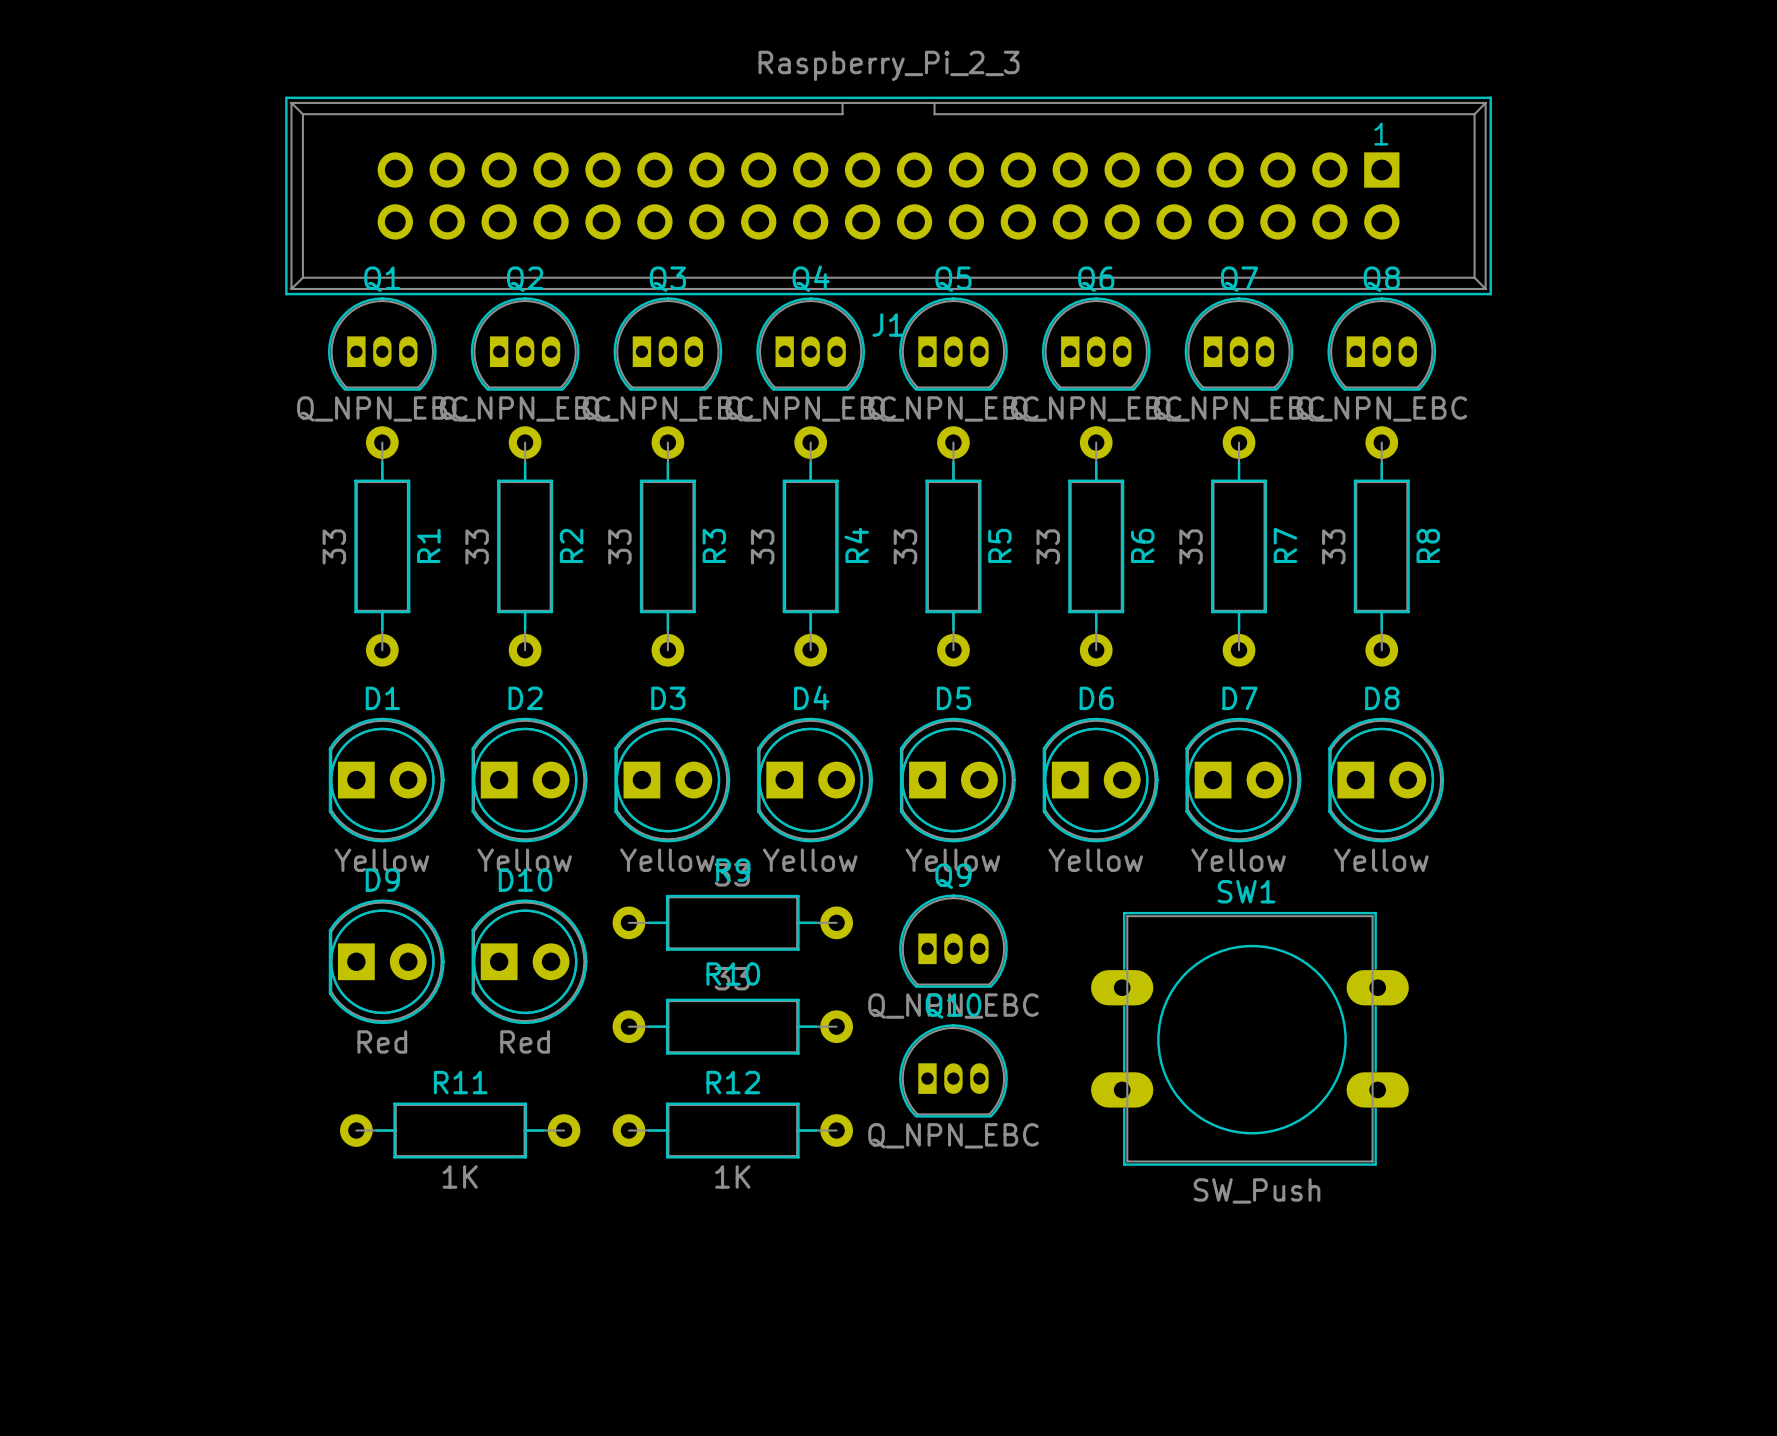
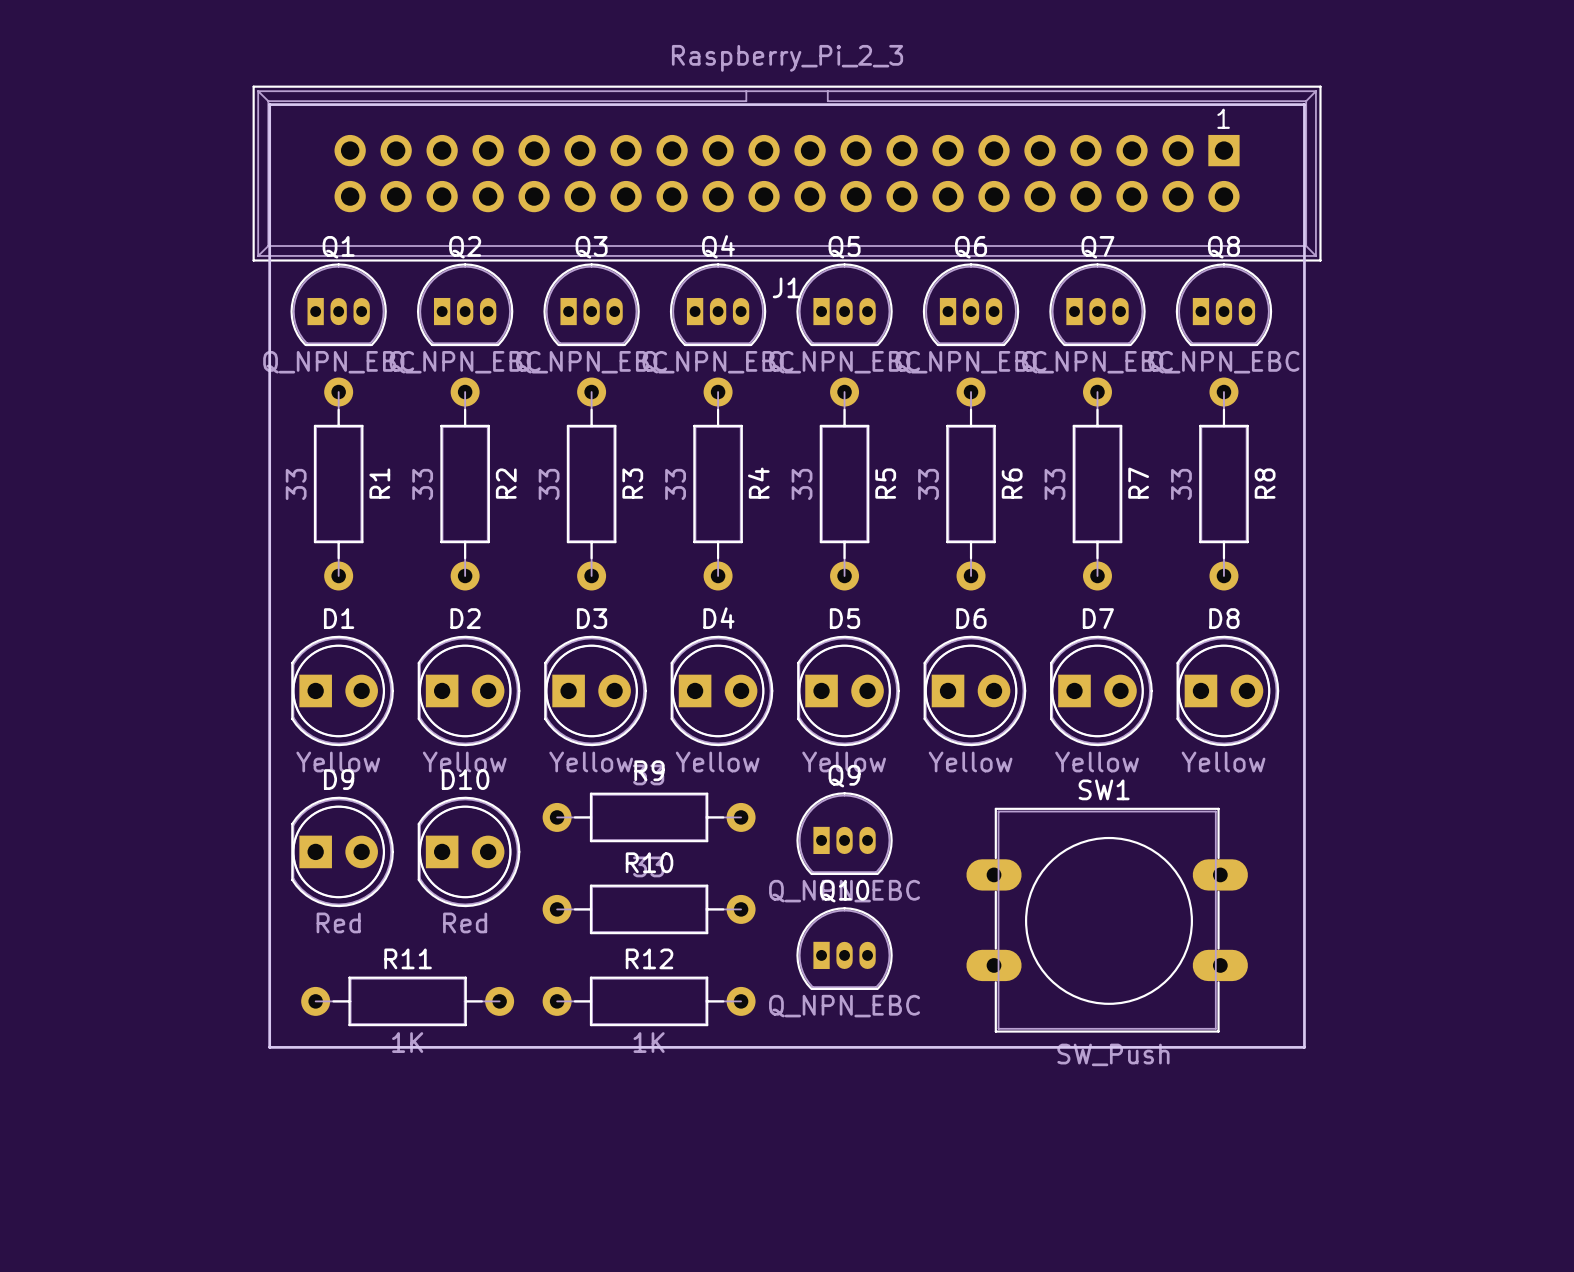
board edge: none -> (269, 104) (269, 1047) (1304, 1047) (1304, 104) (269, 104)

